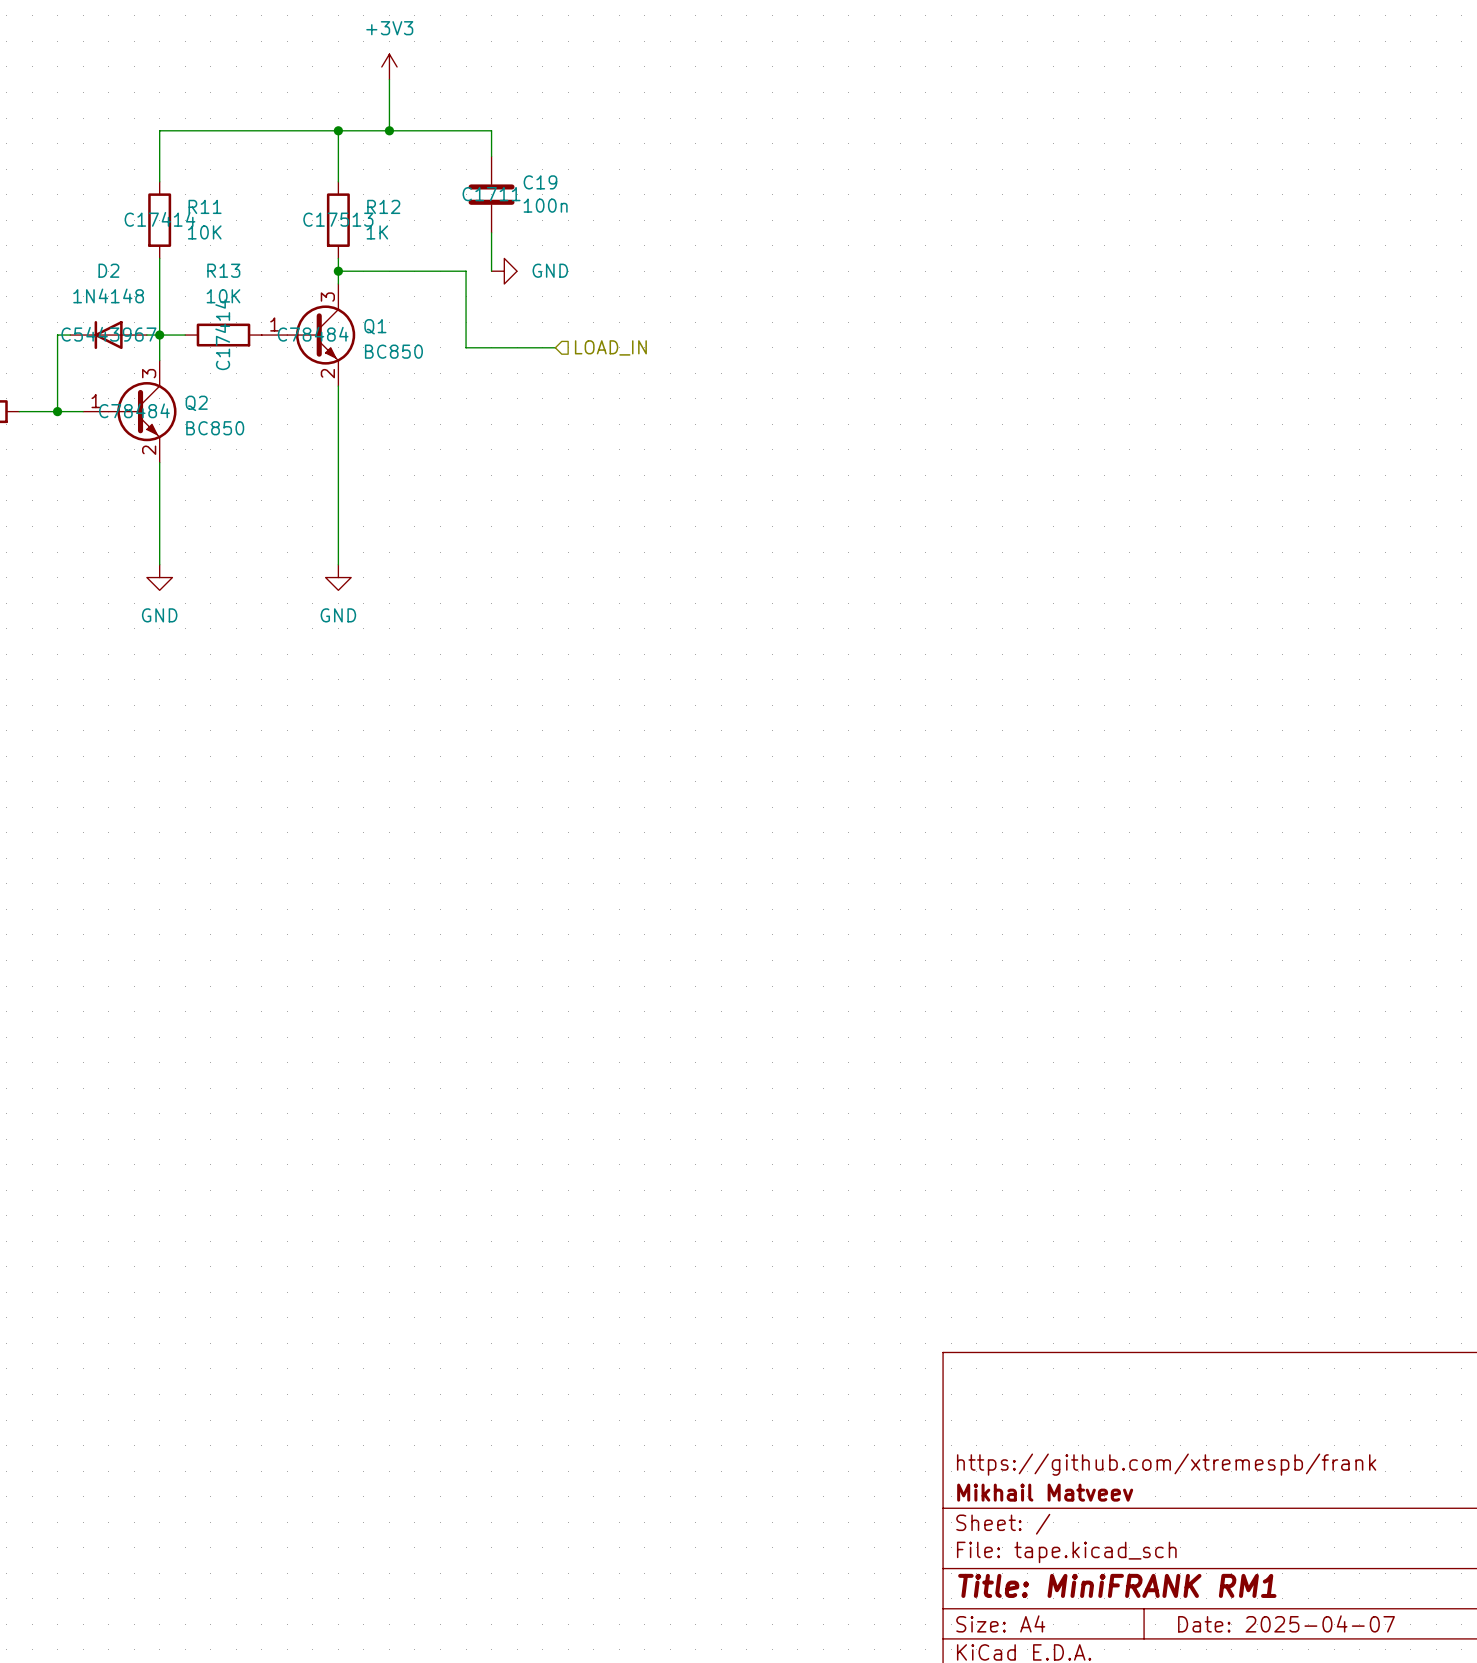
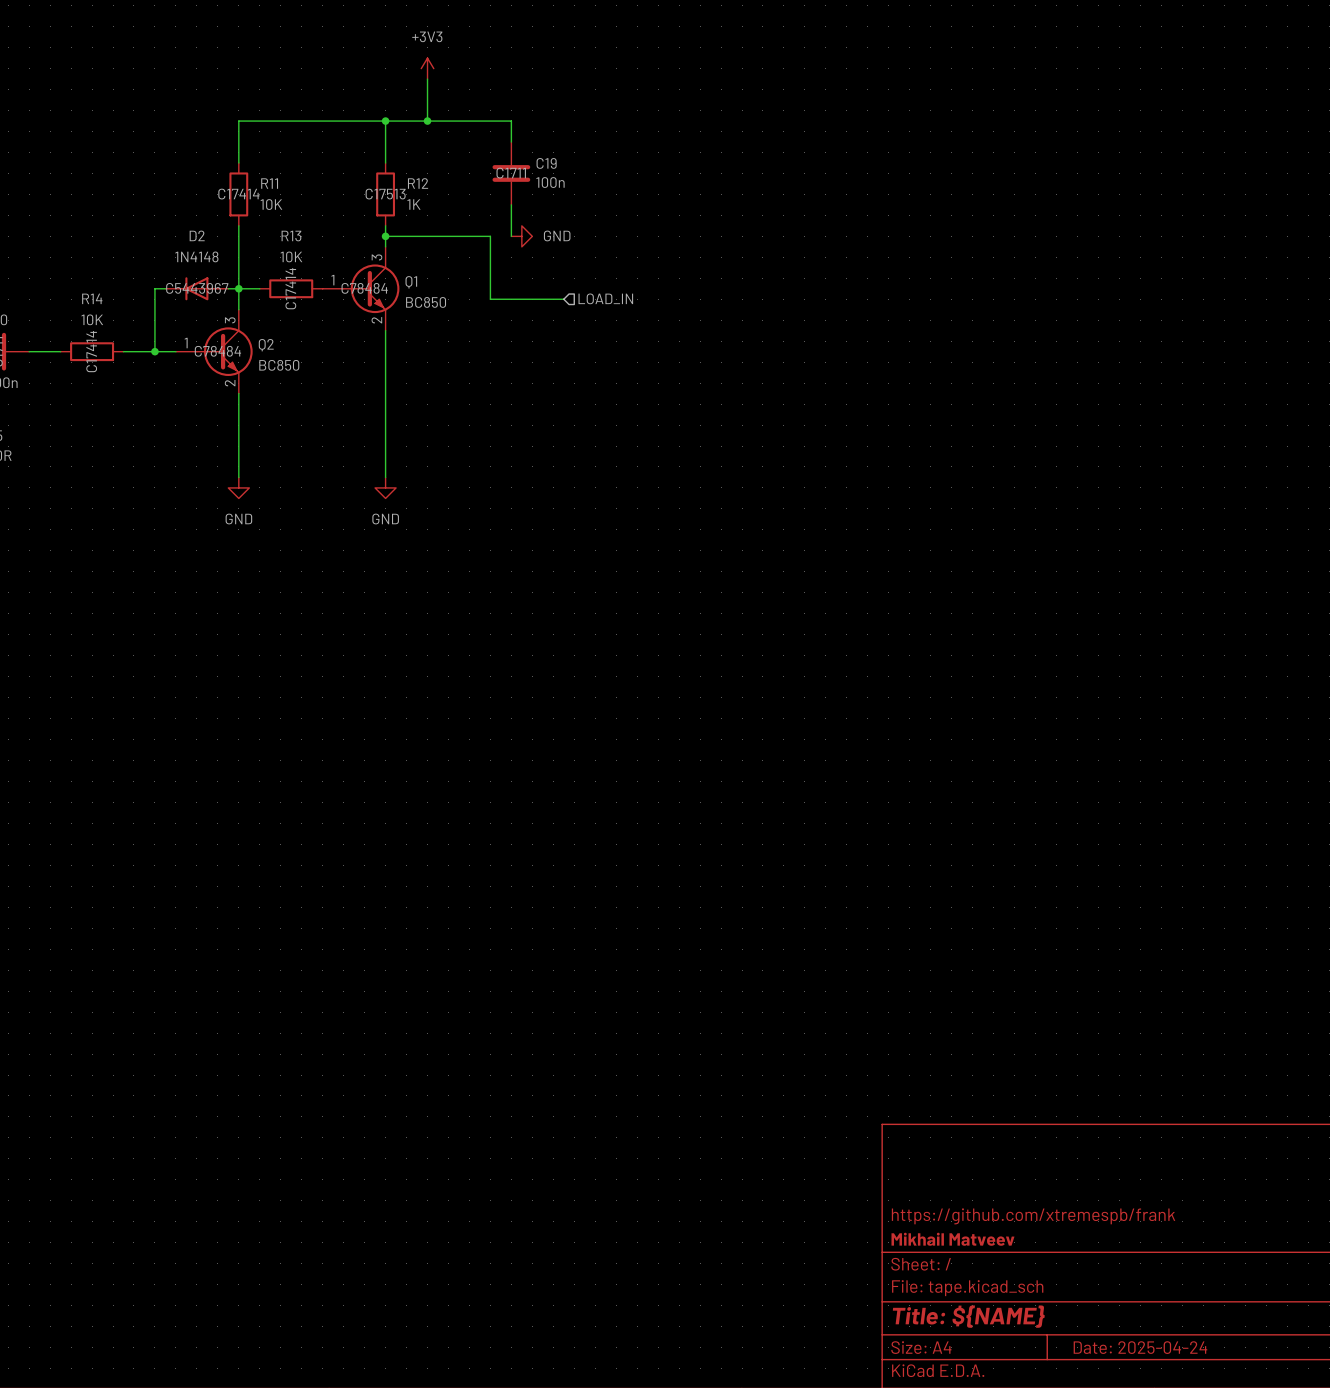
title block: Title: MiniFRANK RM1 (1117, 1585) -> Title: ${NAME} (968, 1316)
title block: Date: 2025-04-07 (1286, 1623) -> Date: 2025-04-24 (1140, 1347)

